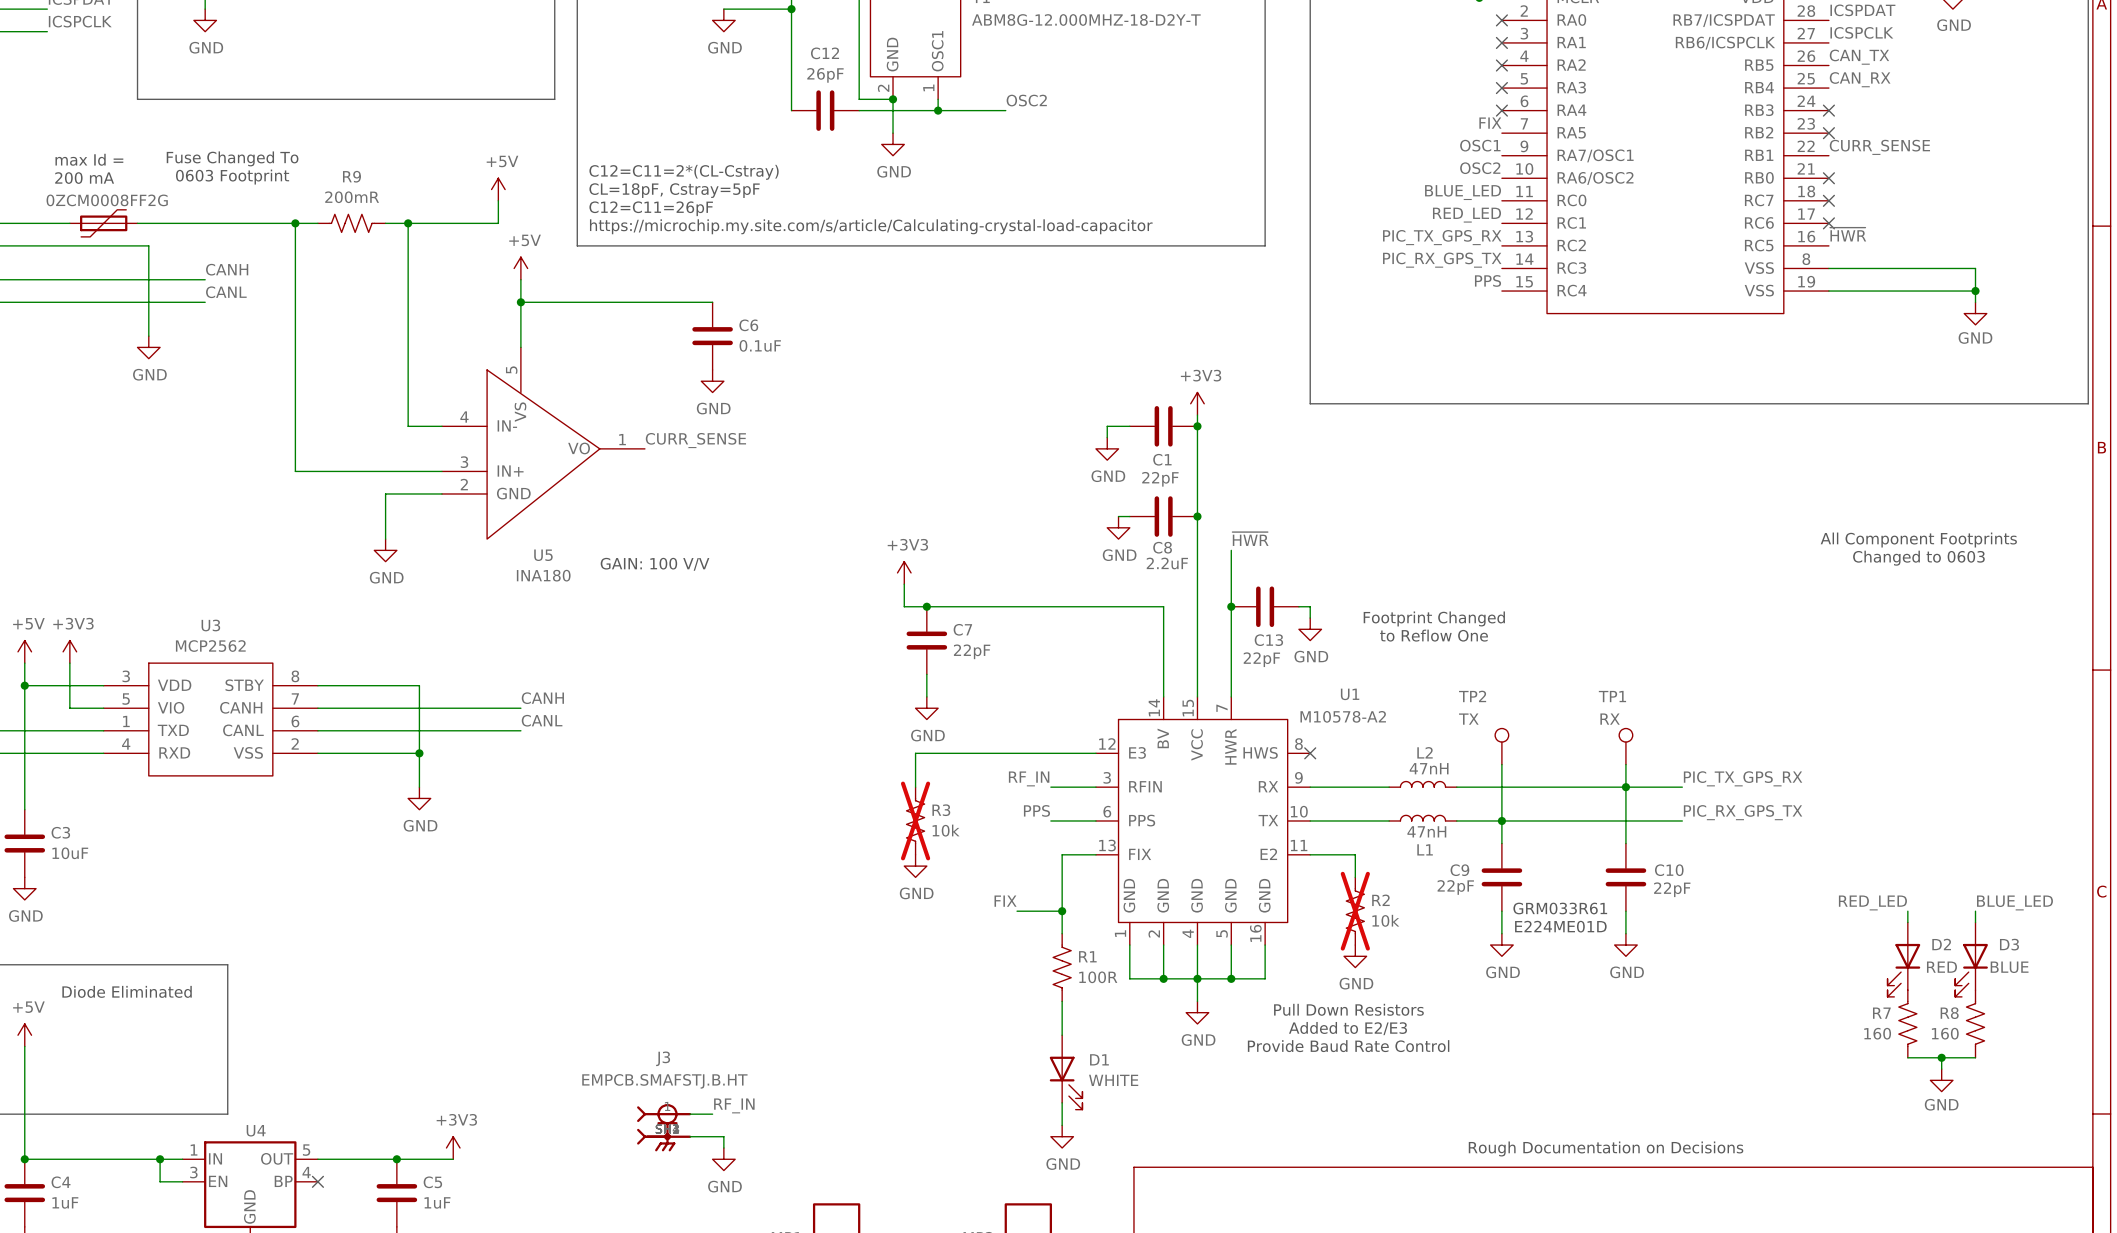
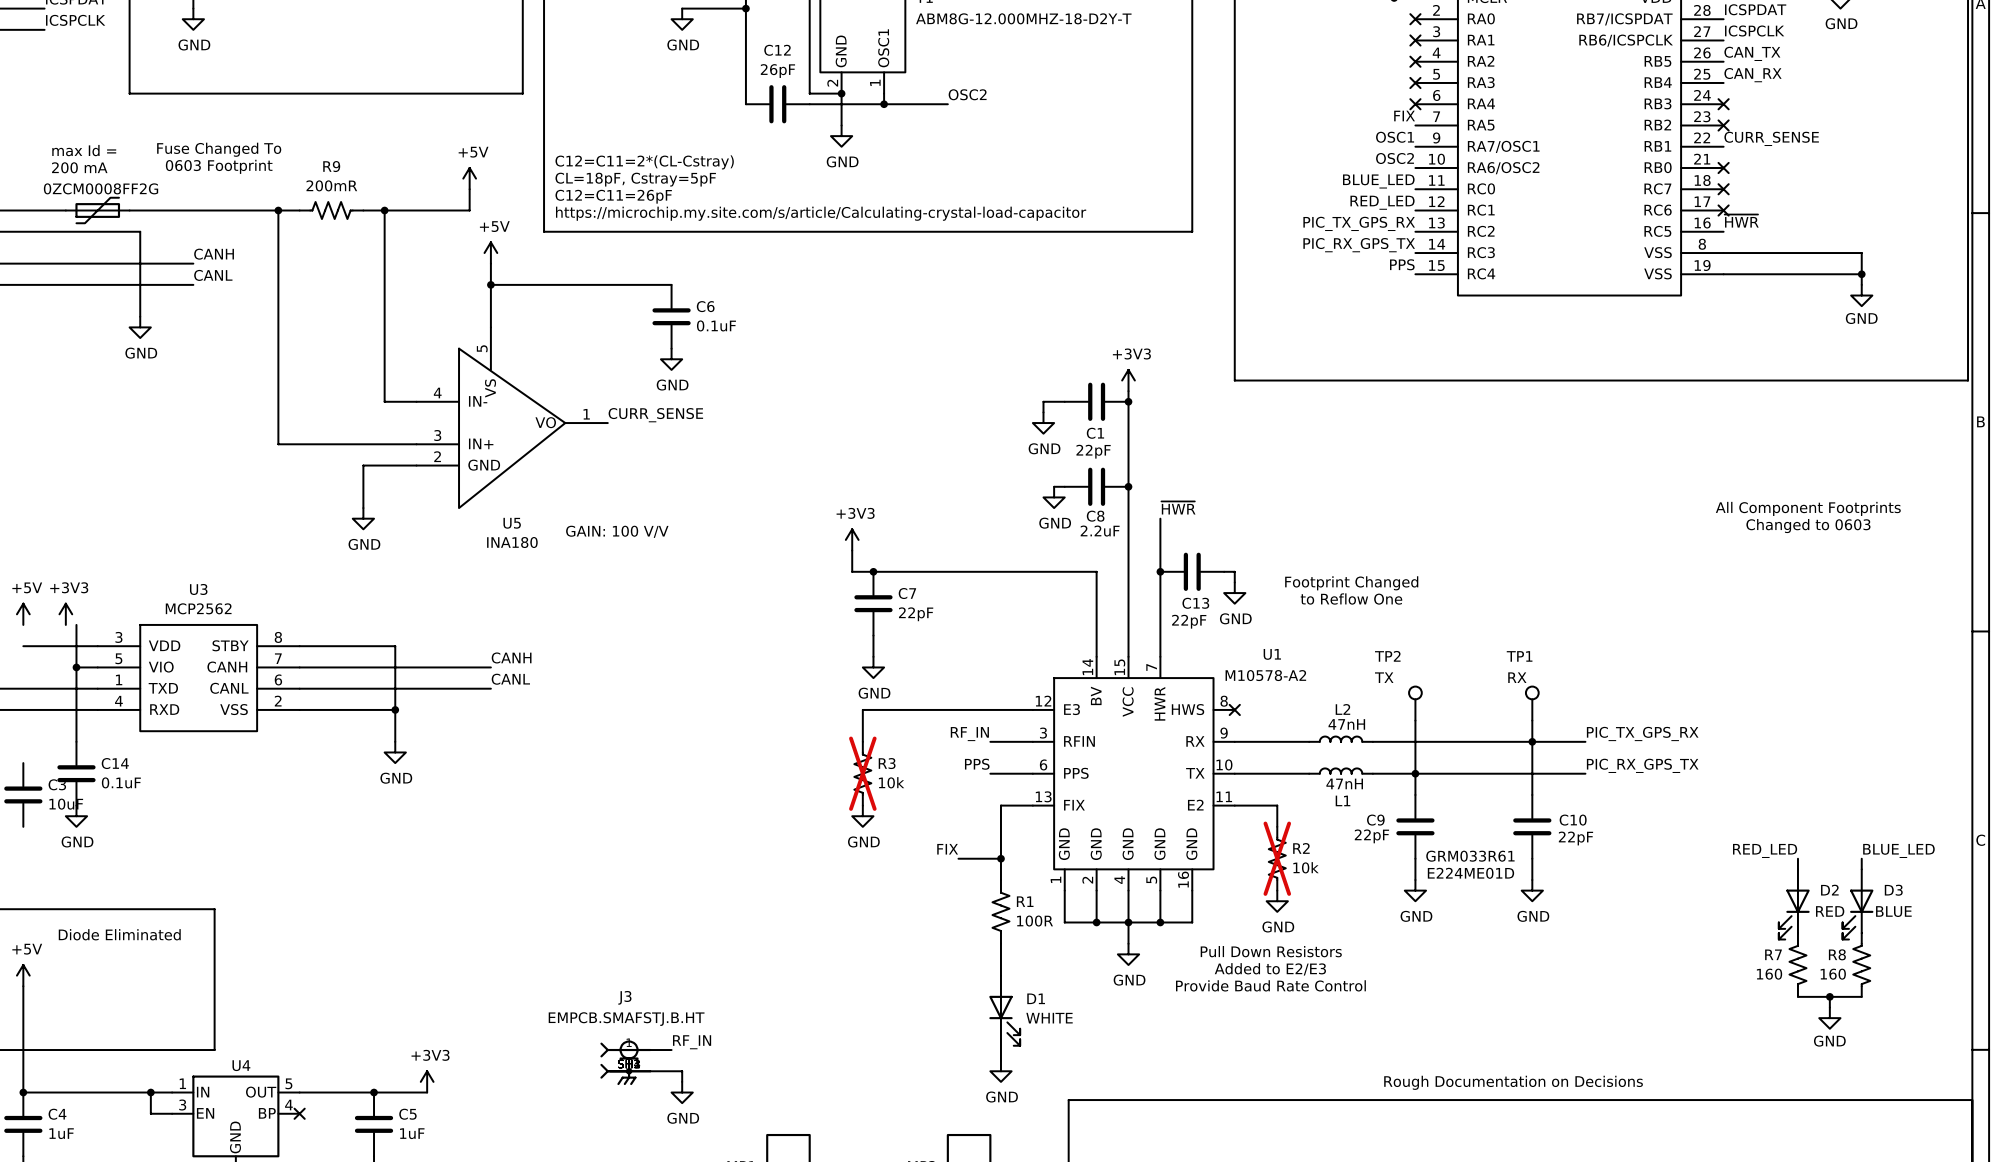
wire: (24, 663) (24, 809) -> none
wire: (69, 663) (69, 708) (81, 708) -> none
wire: none -> (76, 624) (76, 741)
junction: (24, 685) -> none
junction: none -> (76, 667)
C14: none -> 0.1uF (76, 773)
power symbol: none -> GND (76, 816)
power symbol: GND (24, 888) -> none

